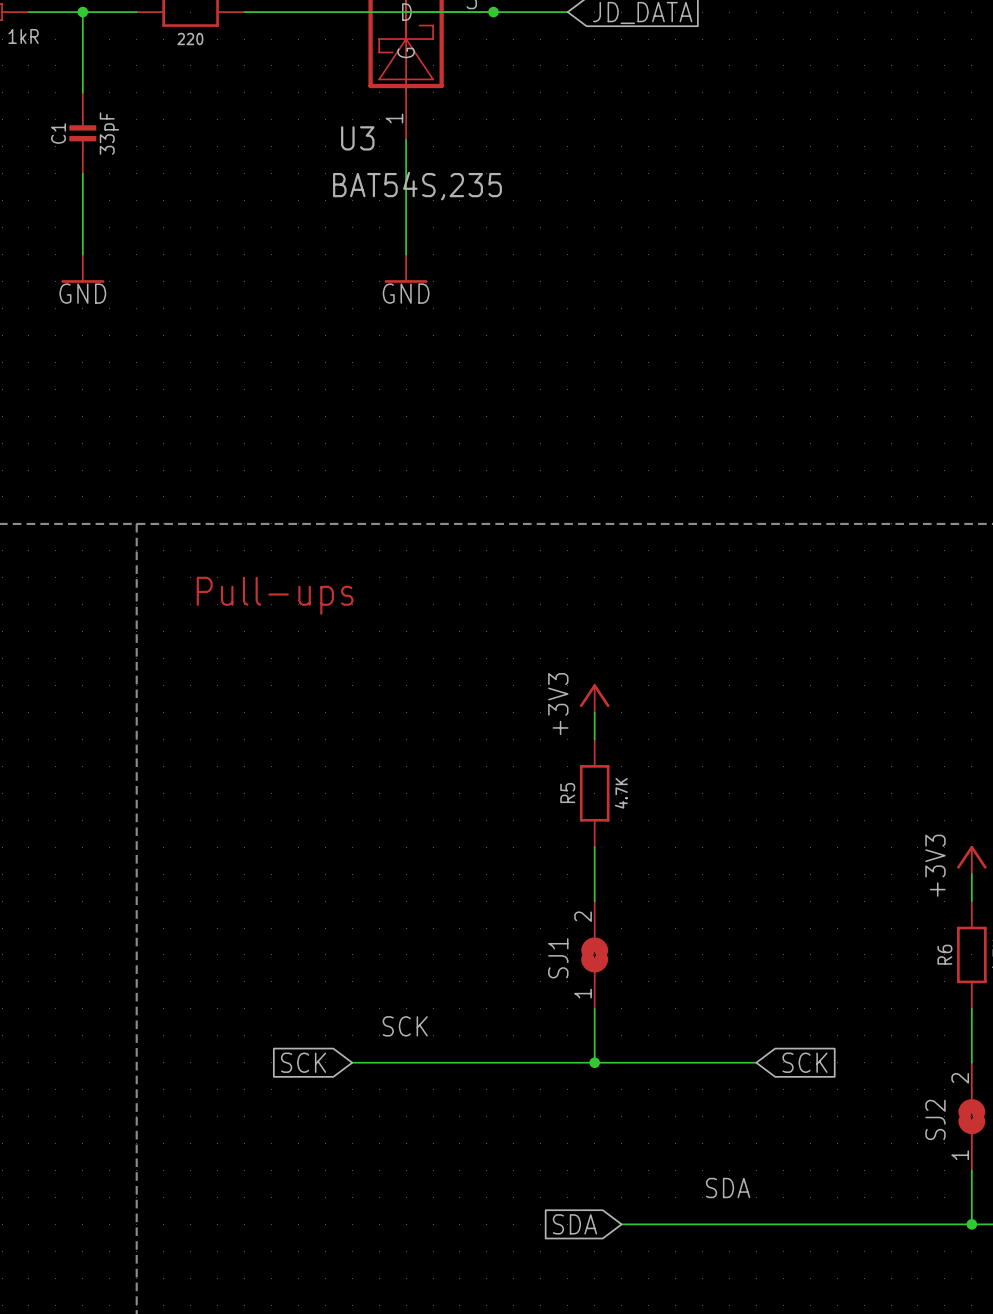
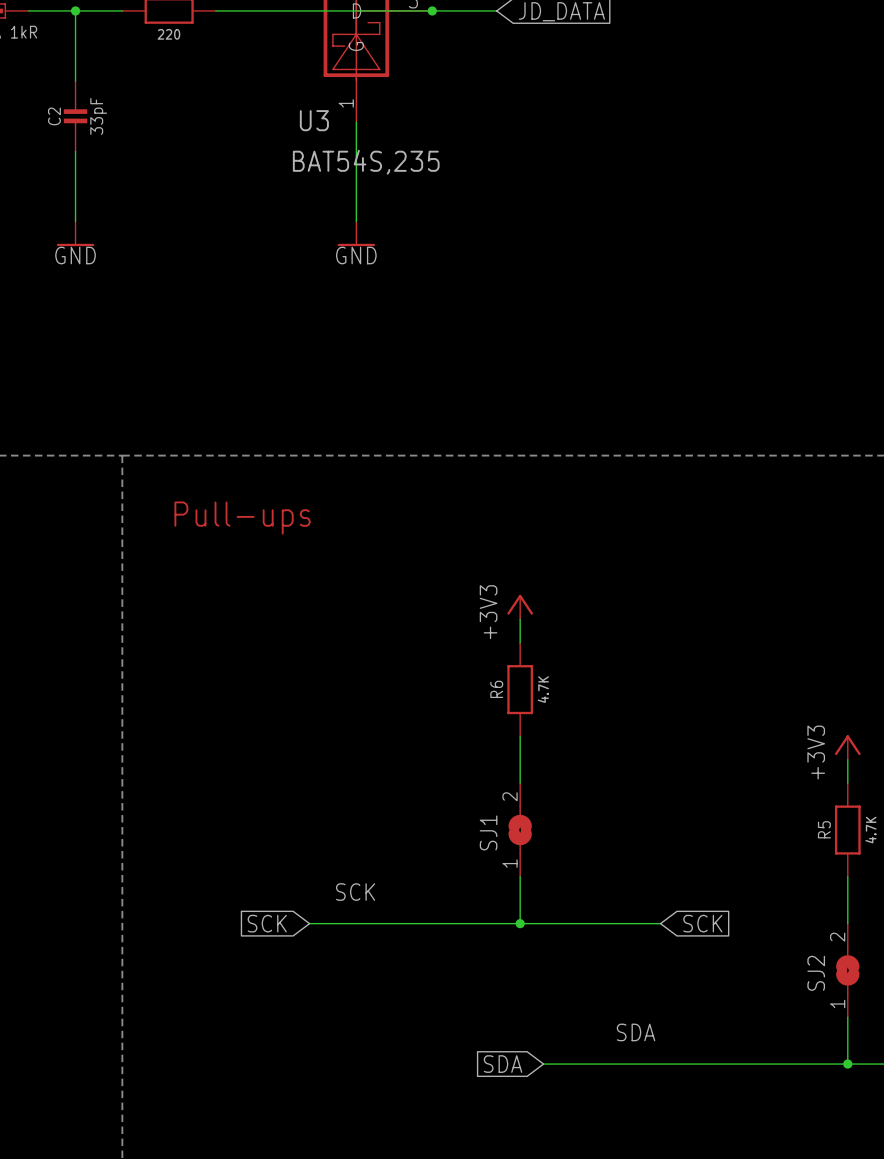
C1 name: C1 (58, 133) -> C2 (54, 116)
R5 name: R5 (567, 793) -> R6 (496, 689)
R6 name: R6 (944, 954) -> R5 (824, 829)

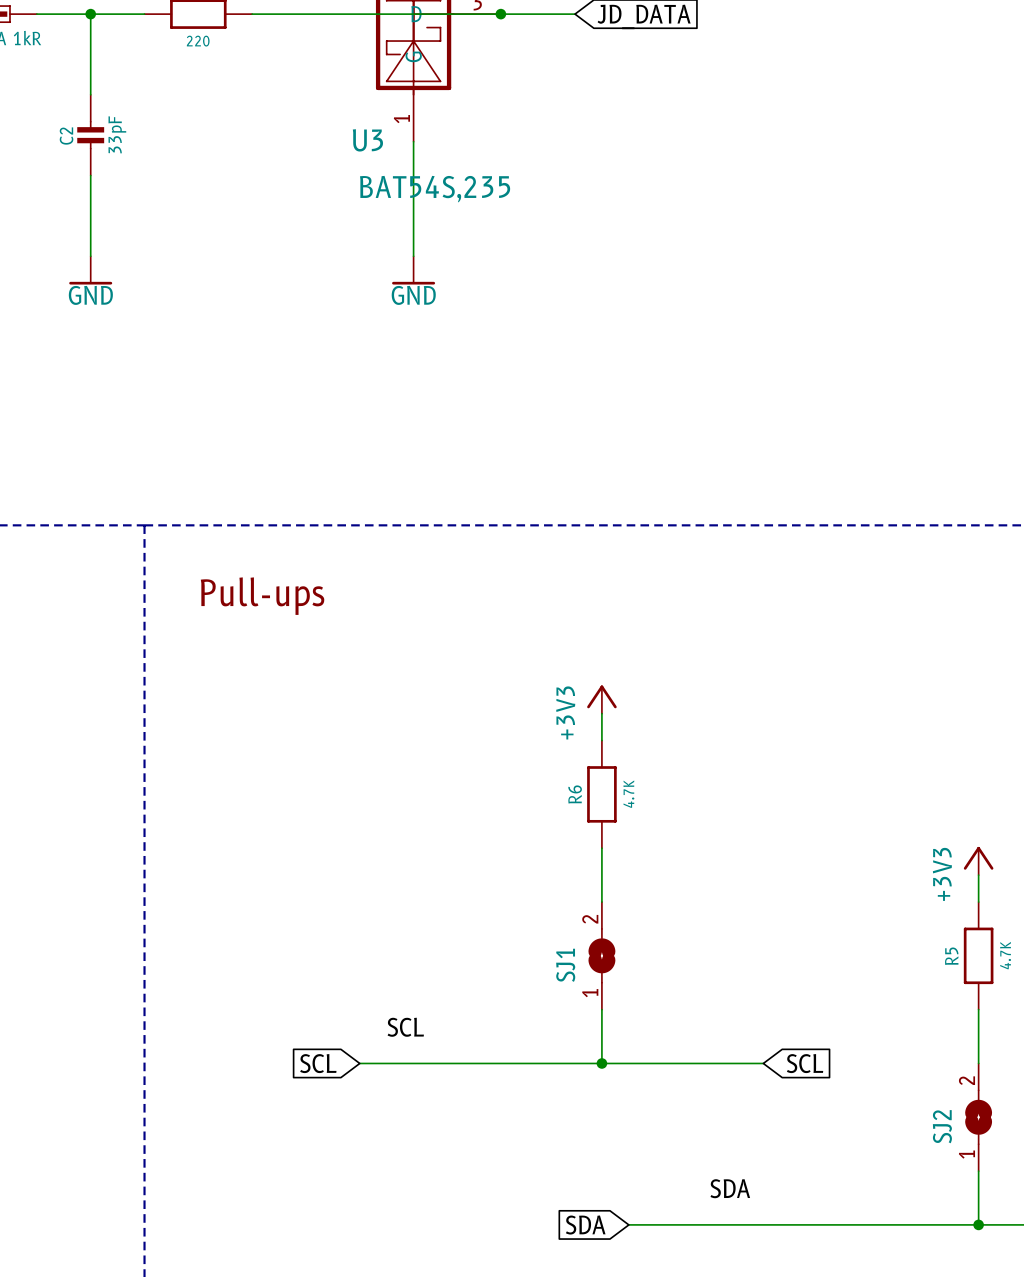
label: SCK (355, 892) -> SCL (405, 1027)
global label: SCK (267, 923) -> SCL (318, 1063)
global label: SCK (702, 923) -> SCL (805, 1063)

